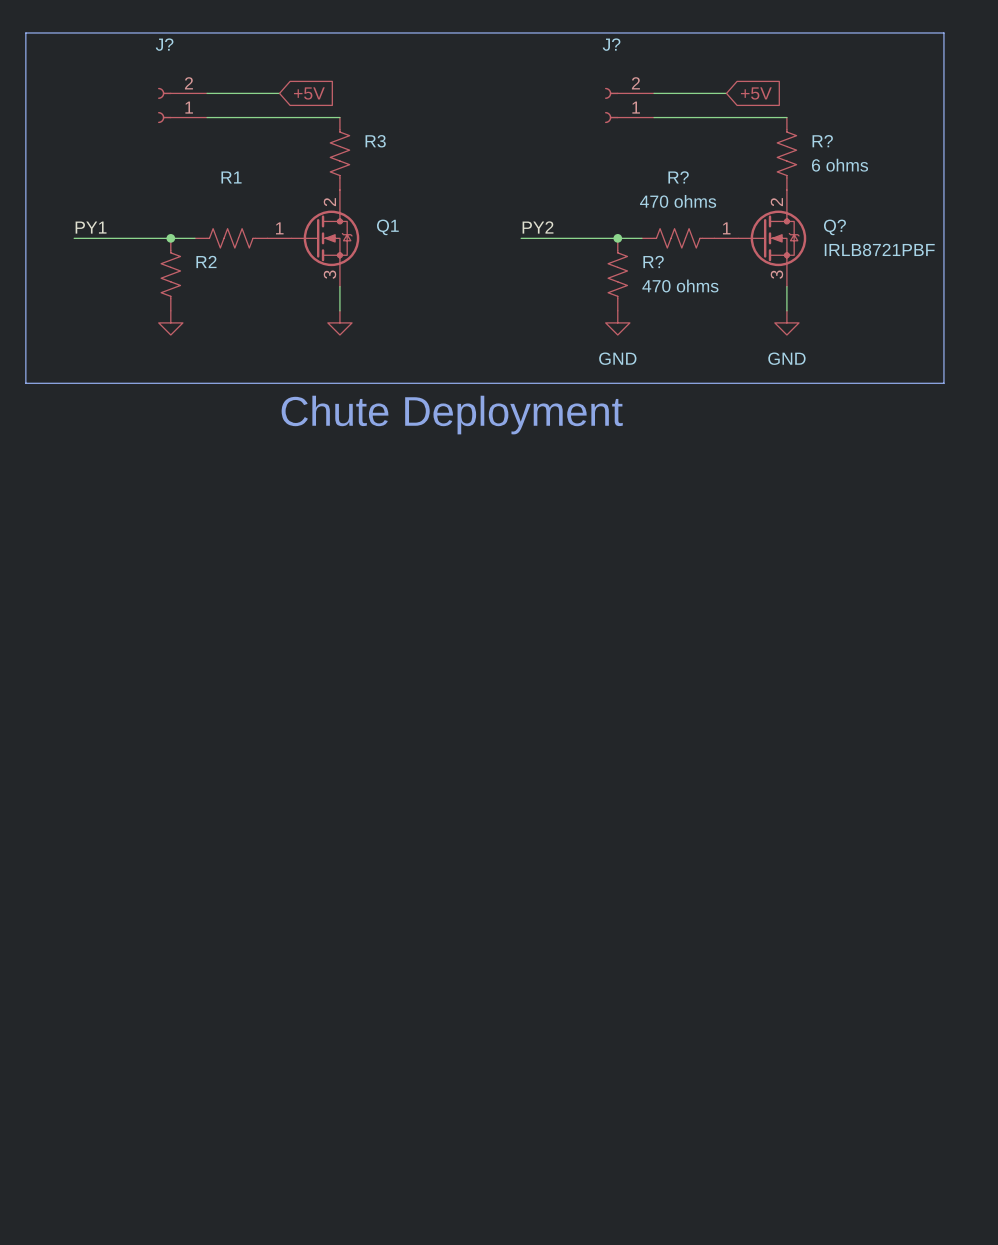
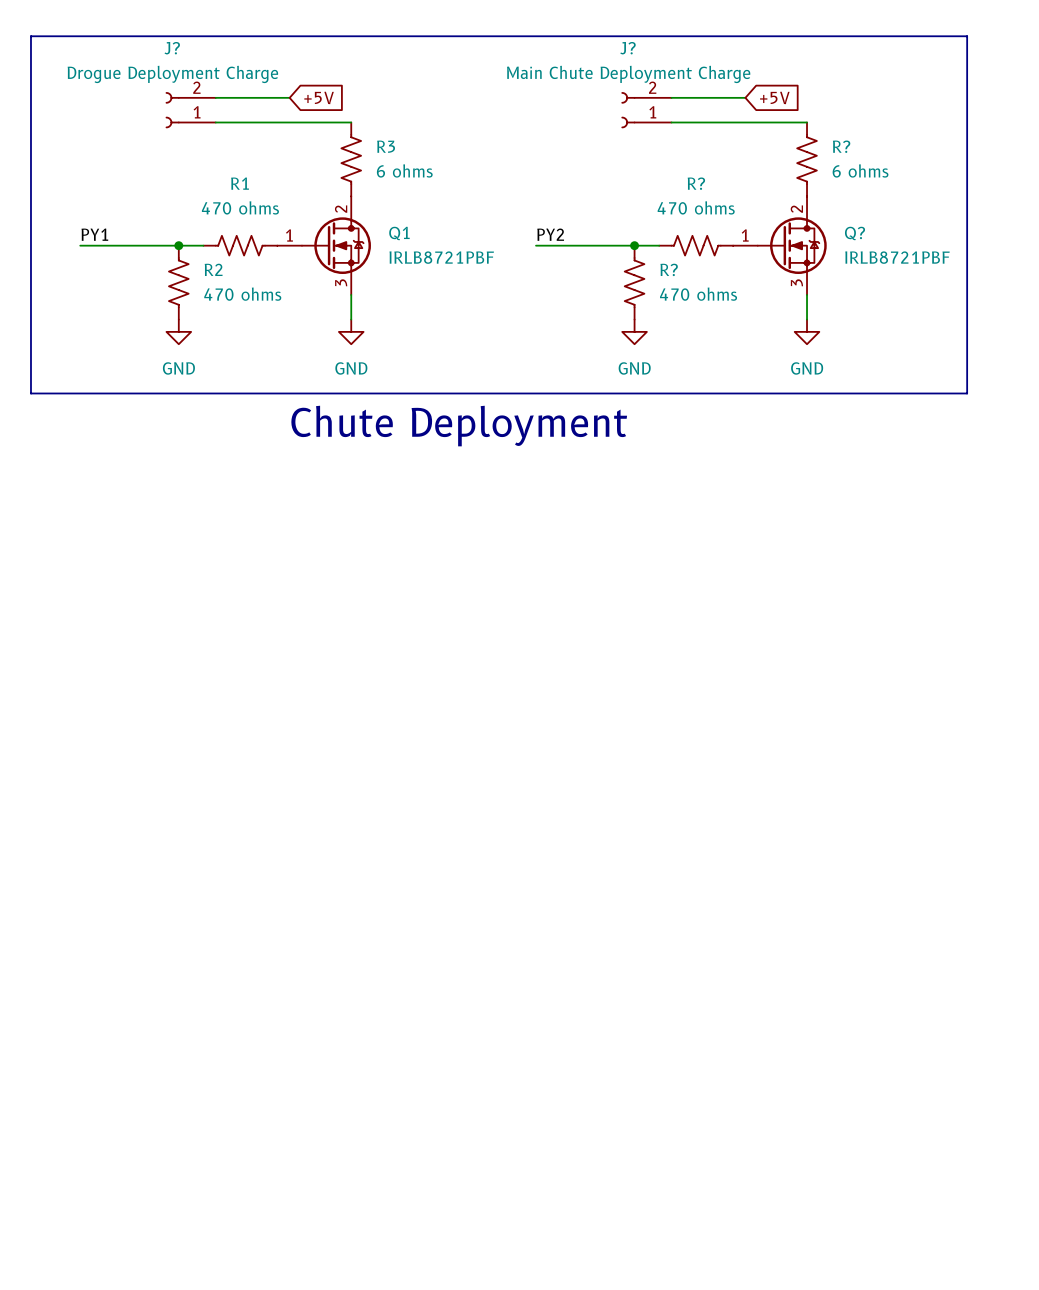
J? value: none -> Drogue Deployment Charge (172, 74)
J? value: none -> Main Chute Deployment Charge (628, 74)
R3 value: none -> 6 ohms (404, 170)
R1 value: none -> 470 ohms (240, 207)
Q1 value: none -> IRLB8721PBF (441, 257)
R2 value: none -> 470 ohms (242, 294)
power symbol text: none -> GND (178, 368)
power symbol text: none -> GND (351, 368)

